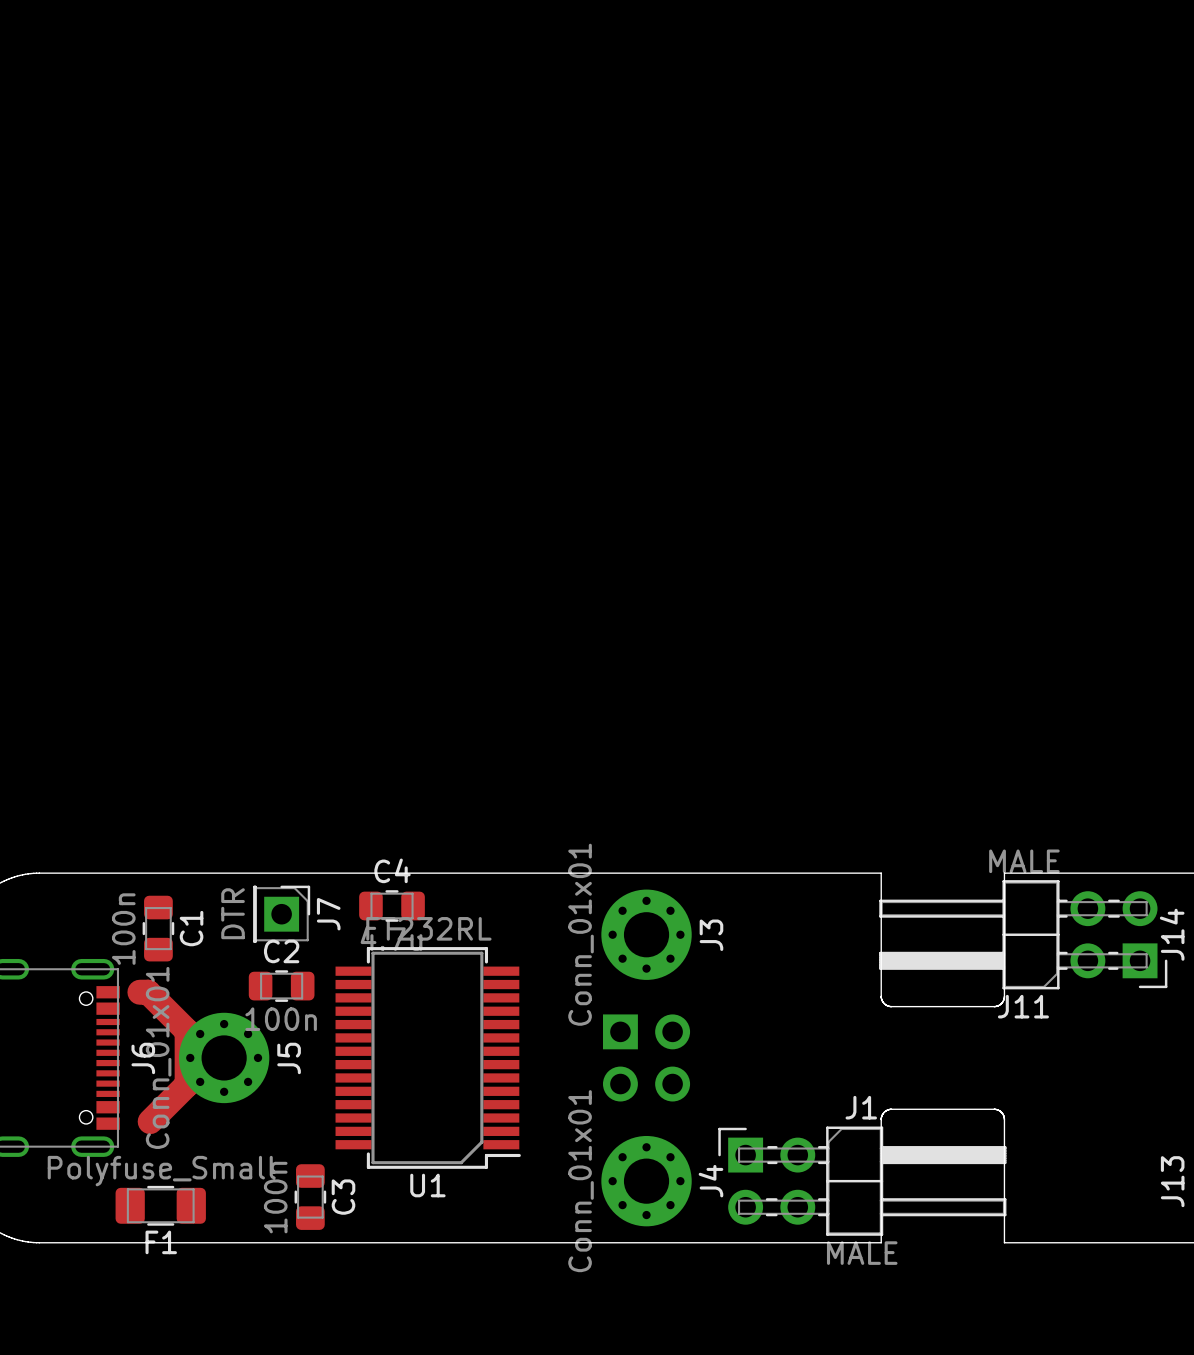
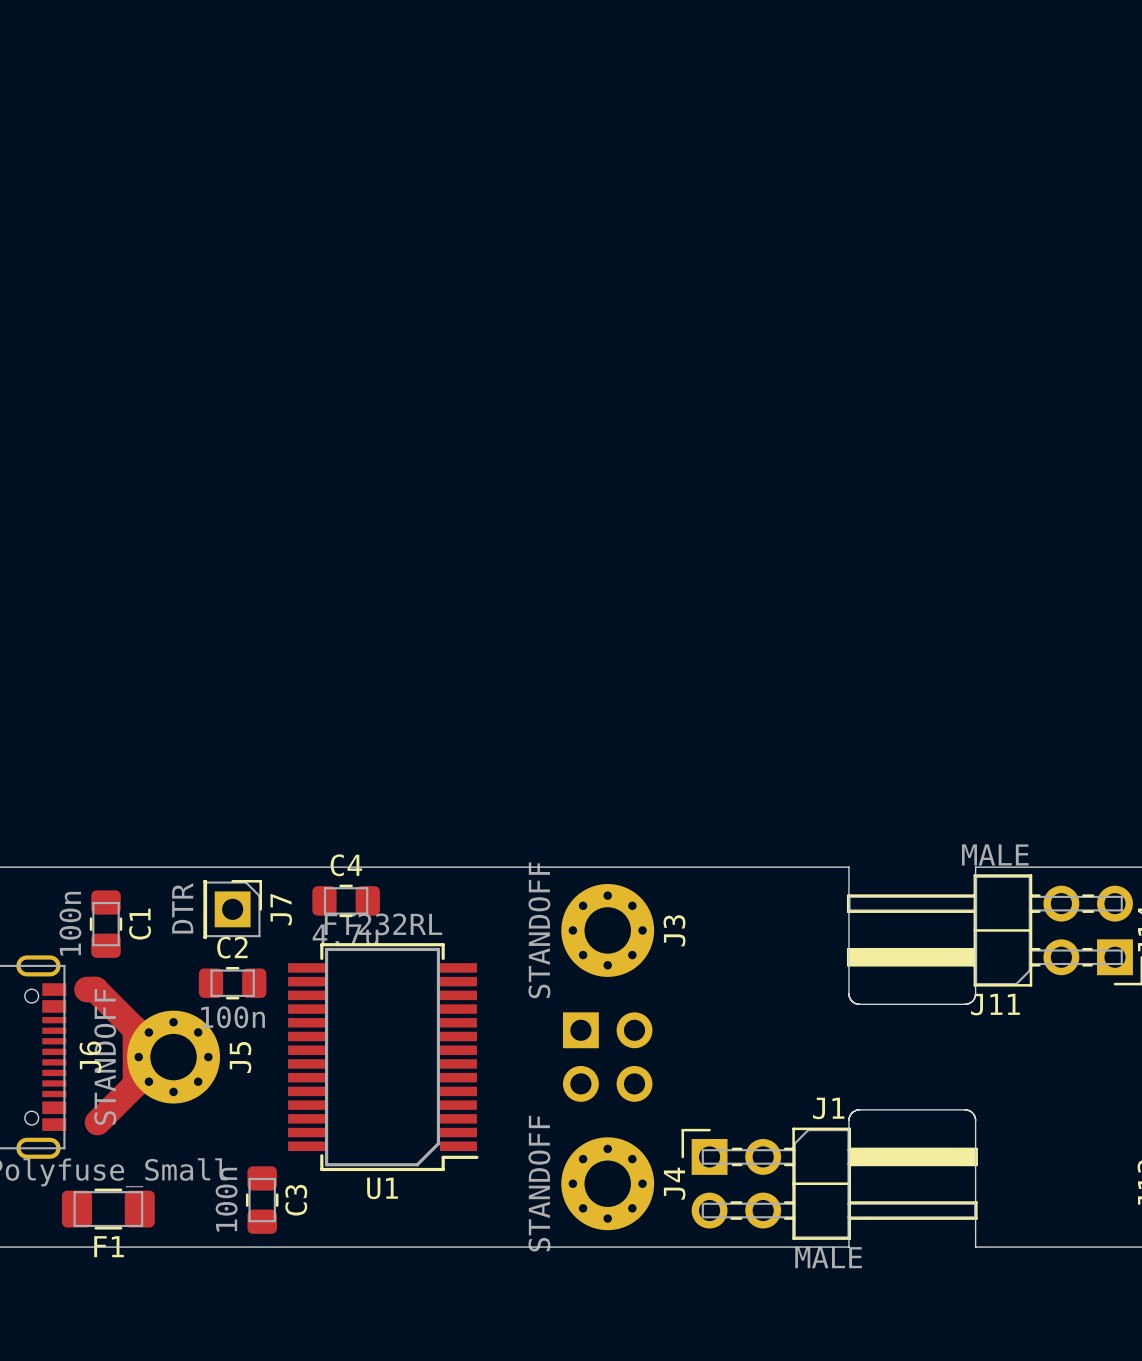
J3 value: Conn_01x01 (581, 934) -> STANDOFF (539, 930)
J5 value: Conn_01x01 (158, 1057) -> STANDOFF (105, 1056)
J4 value: Conn_01x01 (581, 1181) -> STANDOFF (539, 1183)

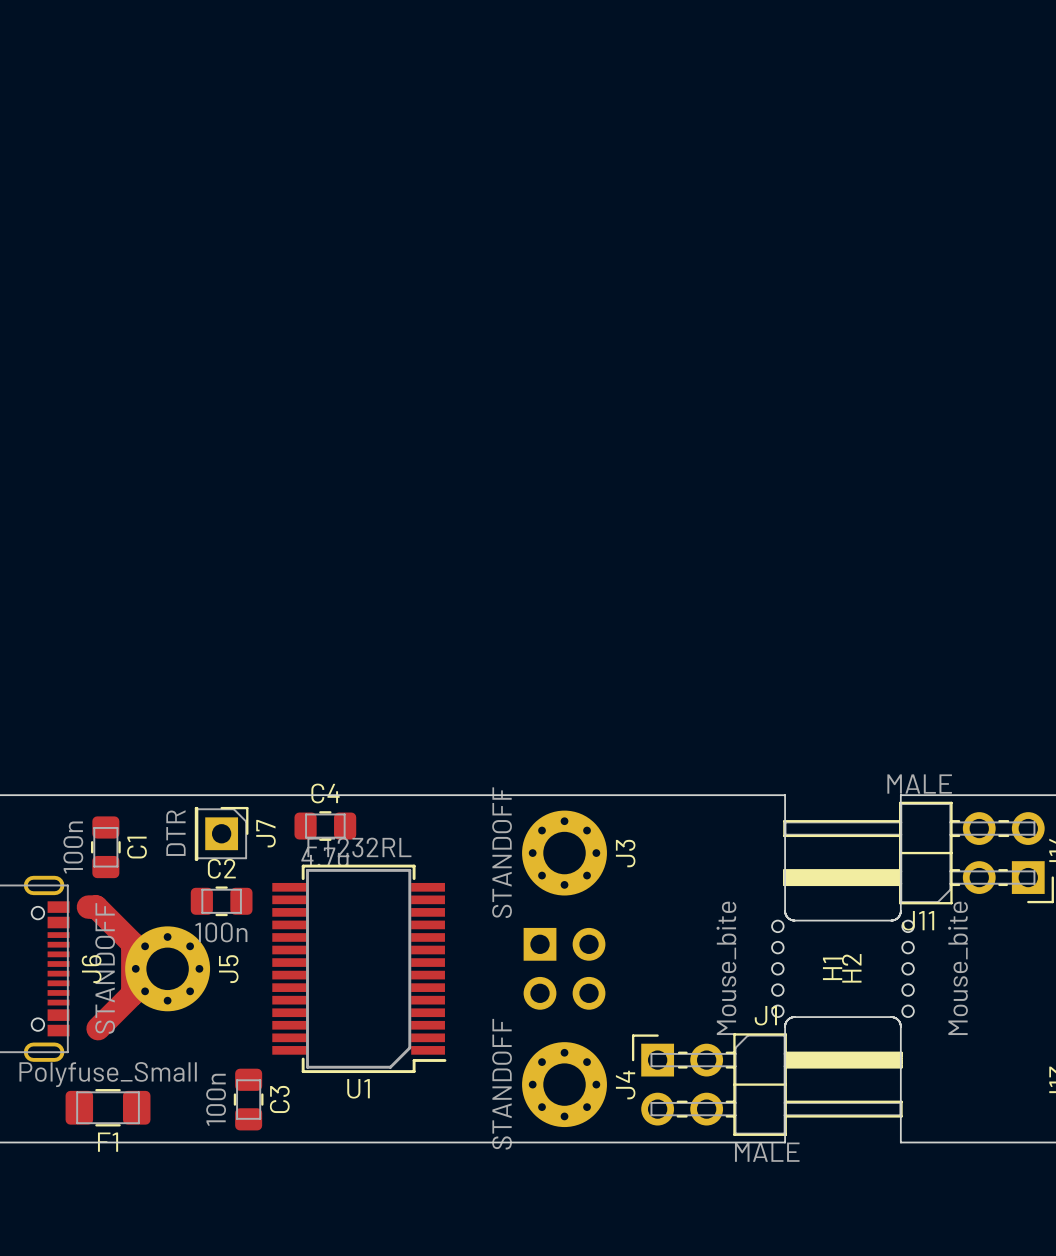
H1: none -> Mouse_bite (777, 968)
H2: none -> Mouse_bite (908, 968)

